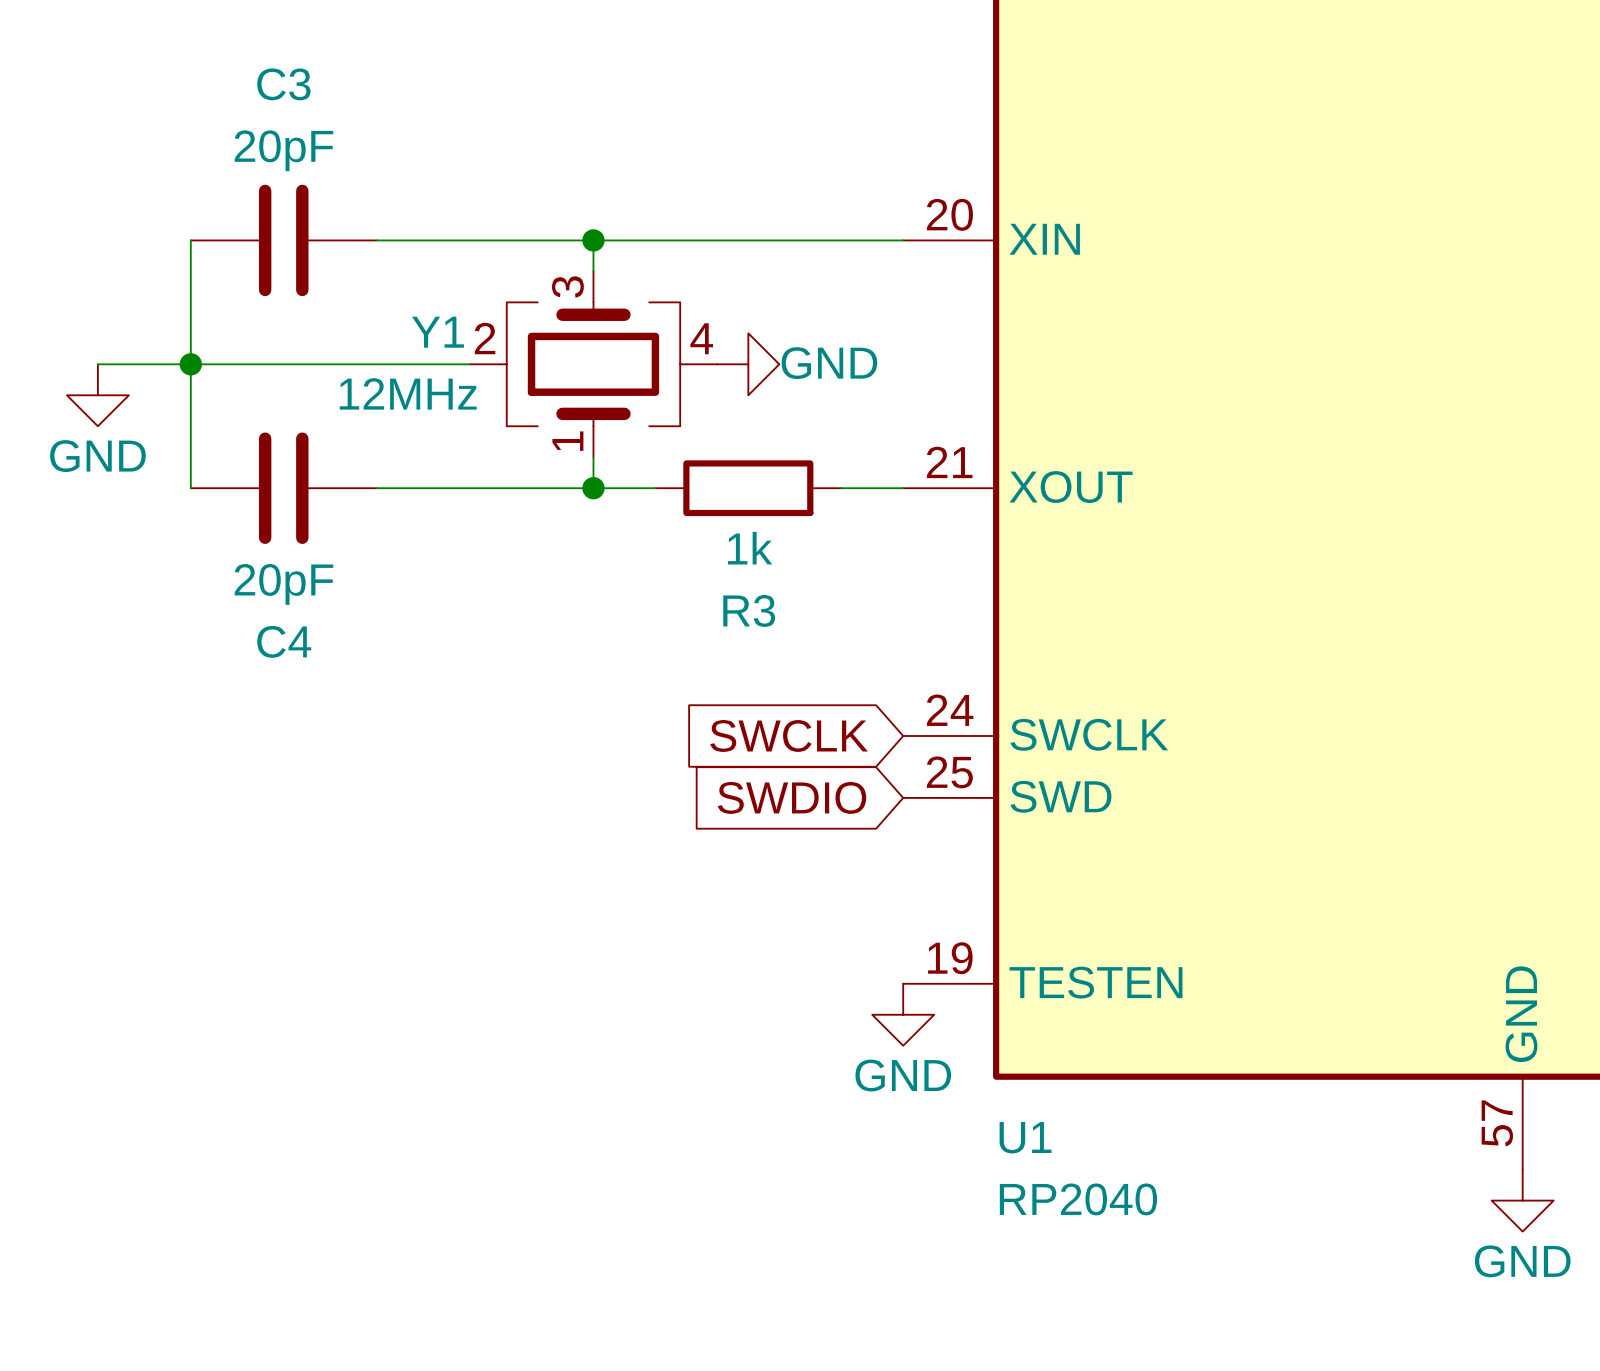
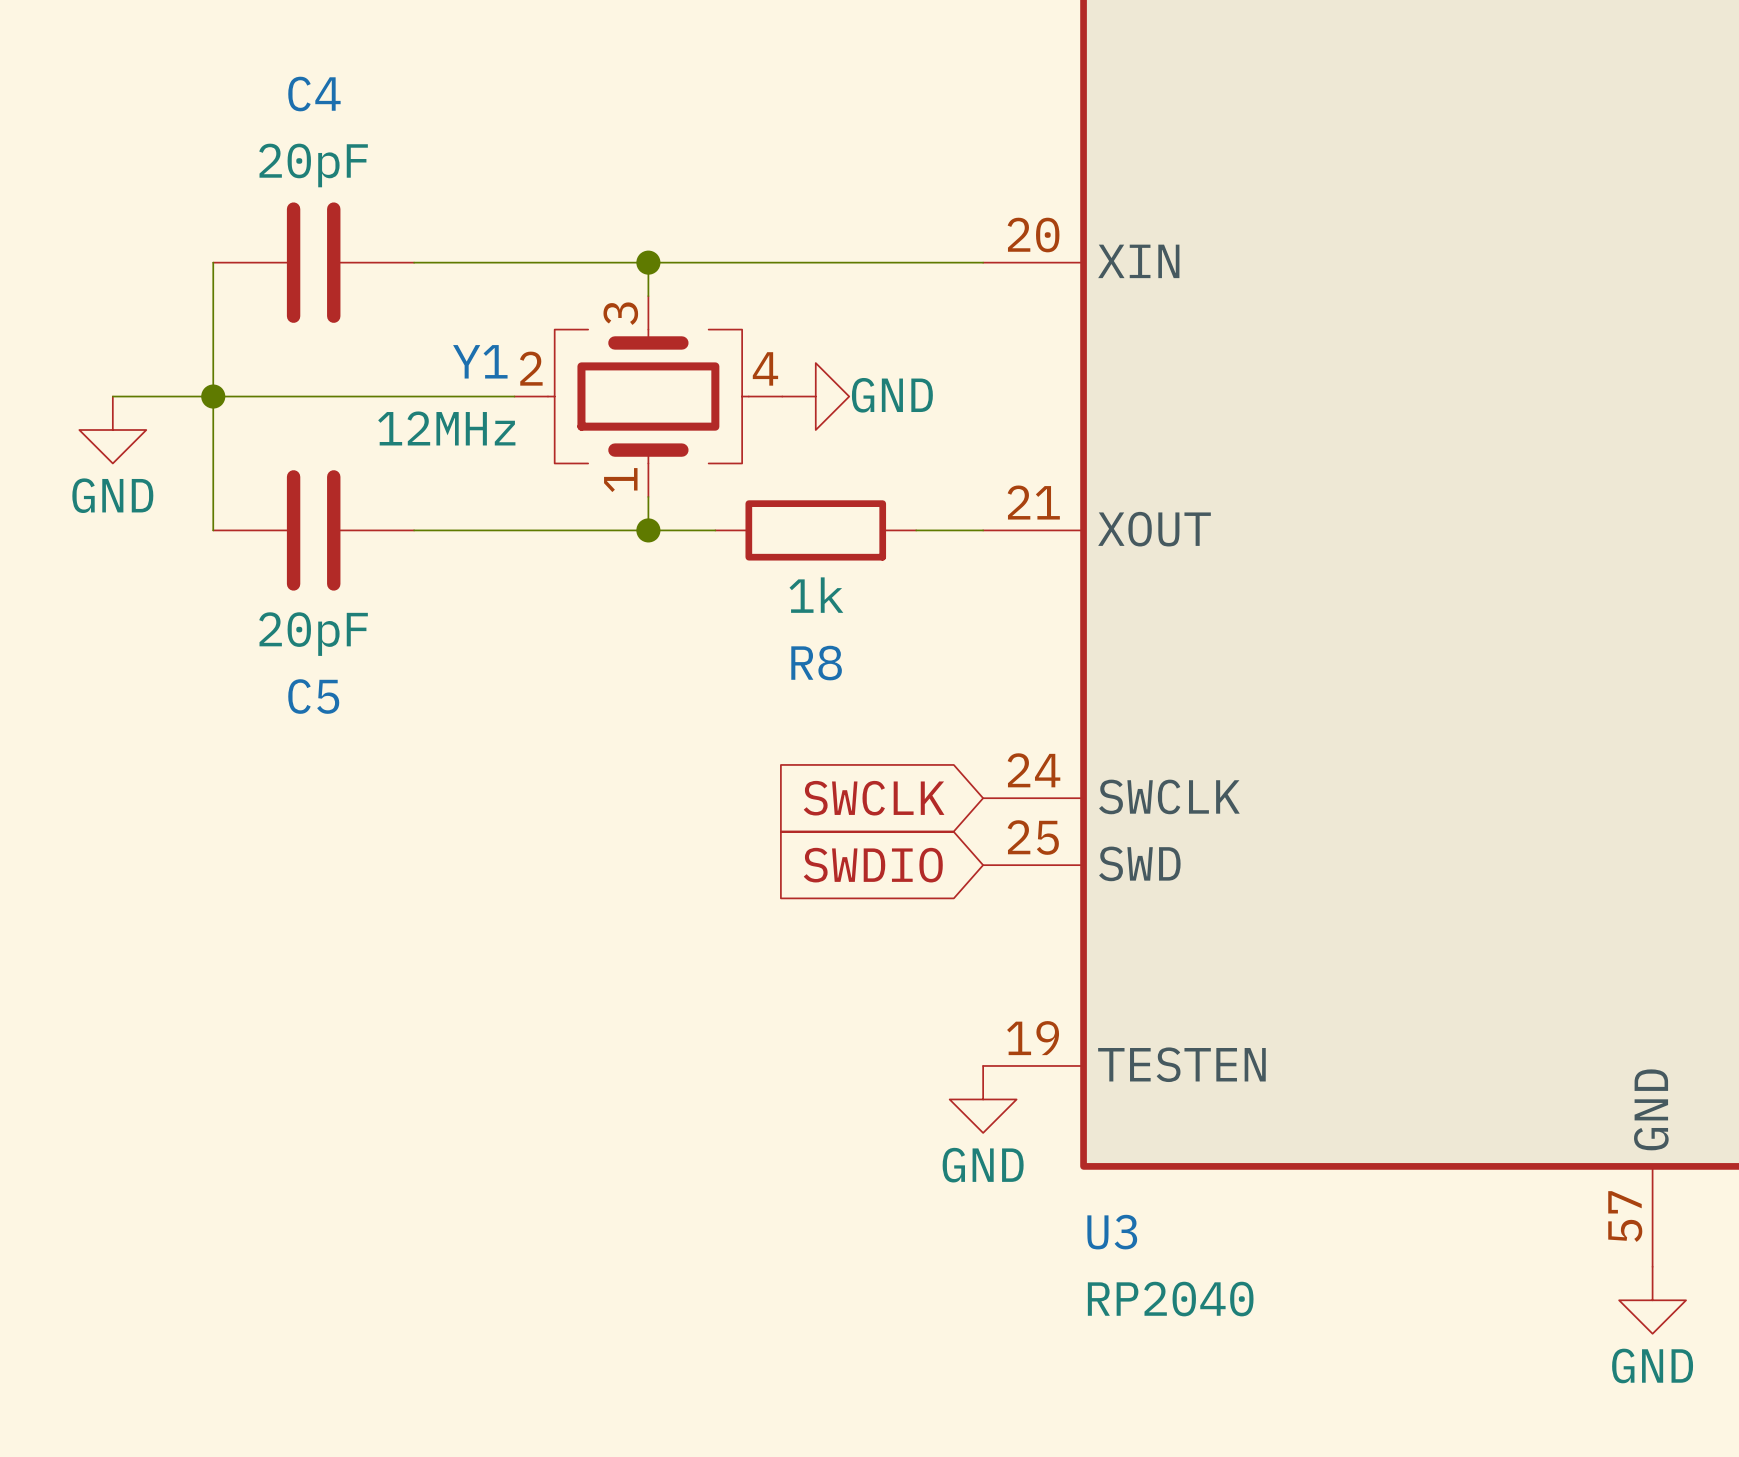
C3 name: C3 (283, 84) -> C4 (314, 94)
R3 name: R3 (749, 610) -> R8 (816, 663)
C4 name: C4 (284, 641) -> C5 (313, 696)
U1 name: U1 (1025, 1137) -> U3 (1112, 1232)

